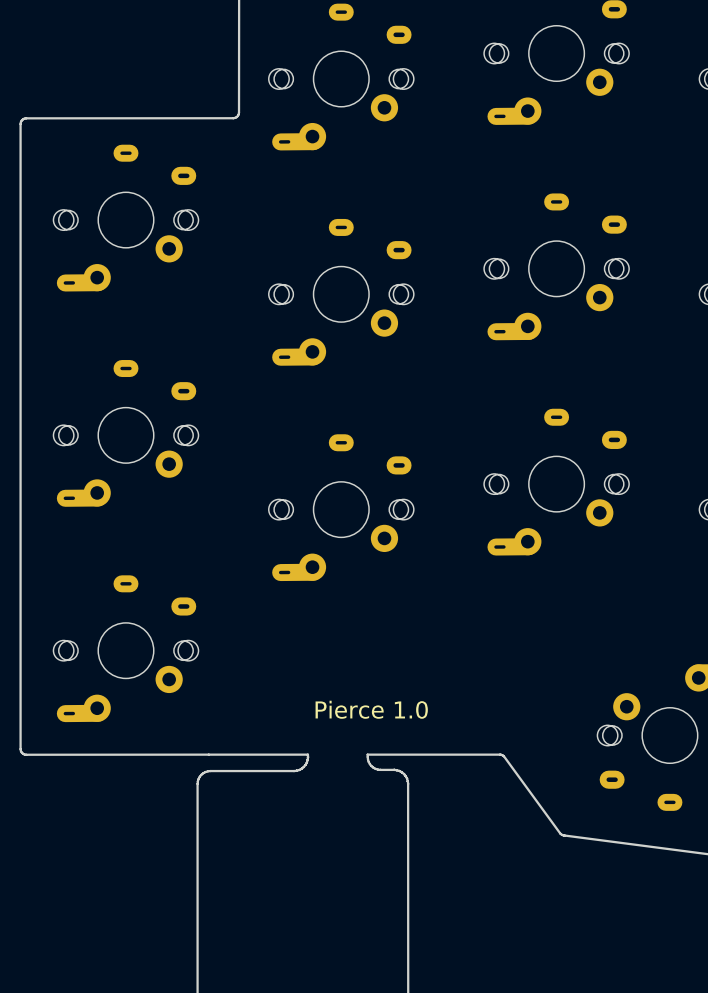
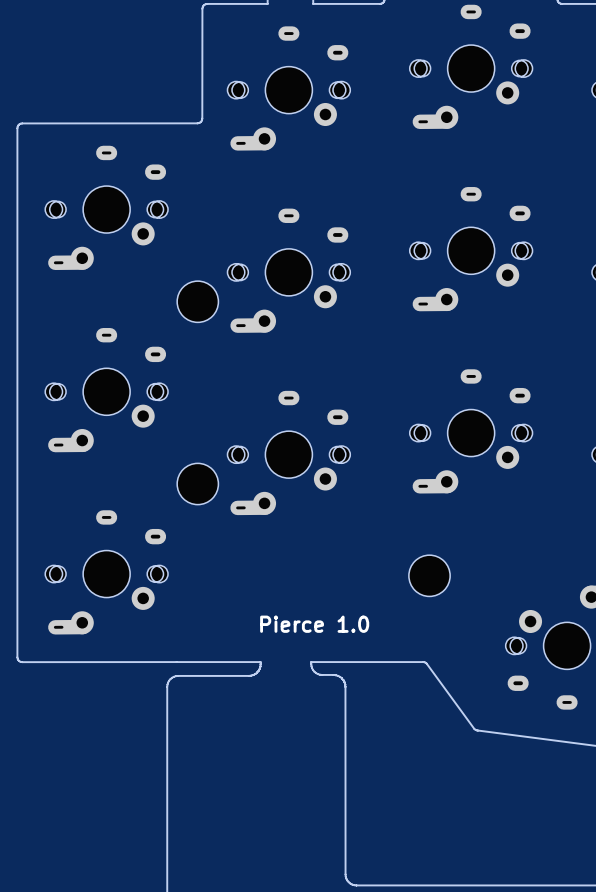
part: none -> (197, 301)
part: none -> (197, 484)
part: none -> (429, 575)

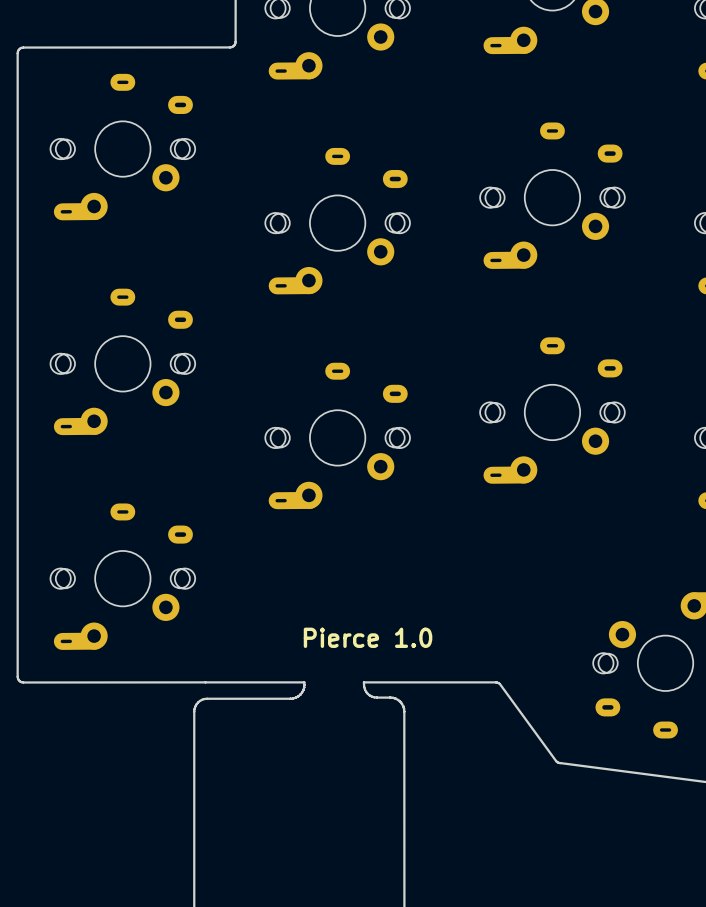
part: (197, 301) -> none
part: (197, 484) -> none
part: (429, 575) -> none

